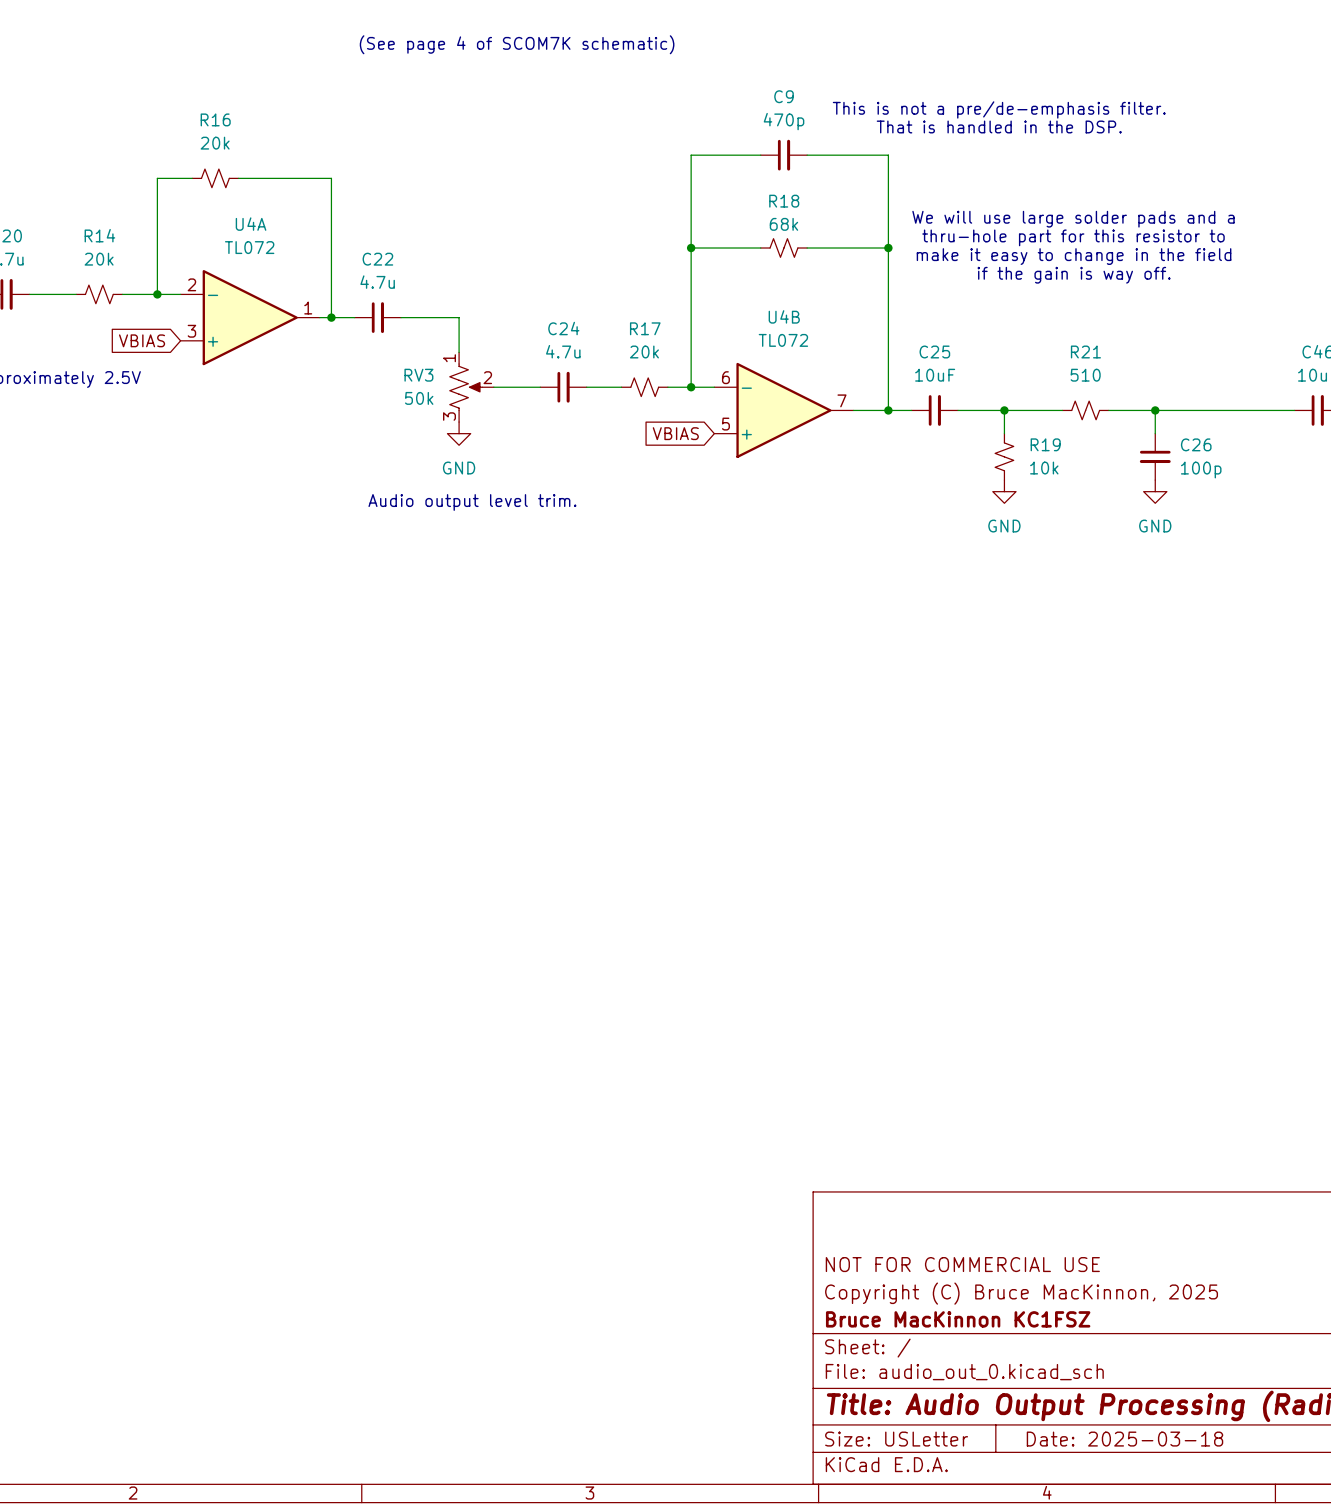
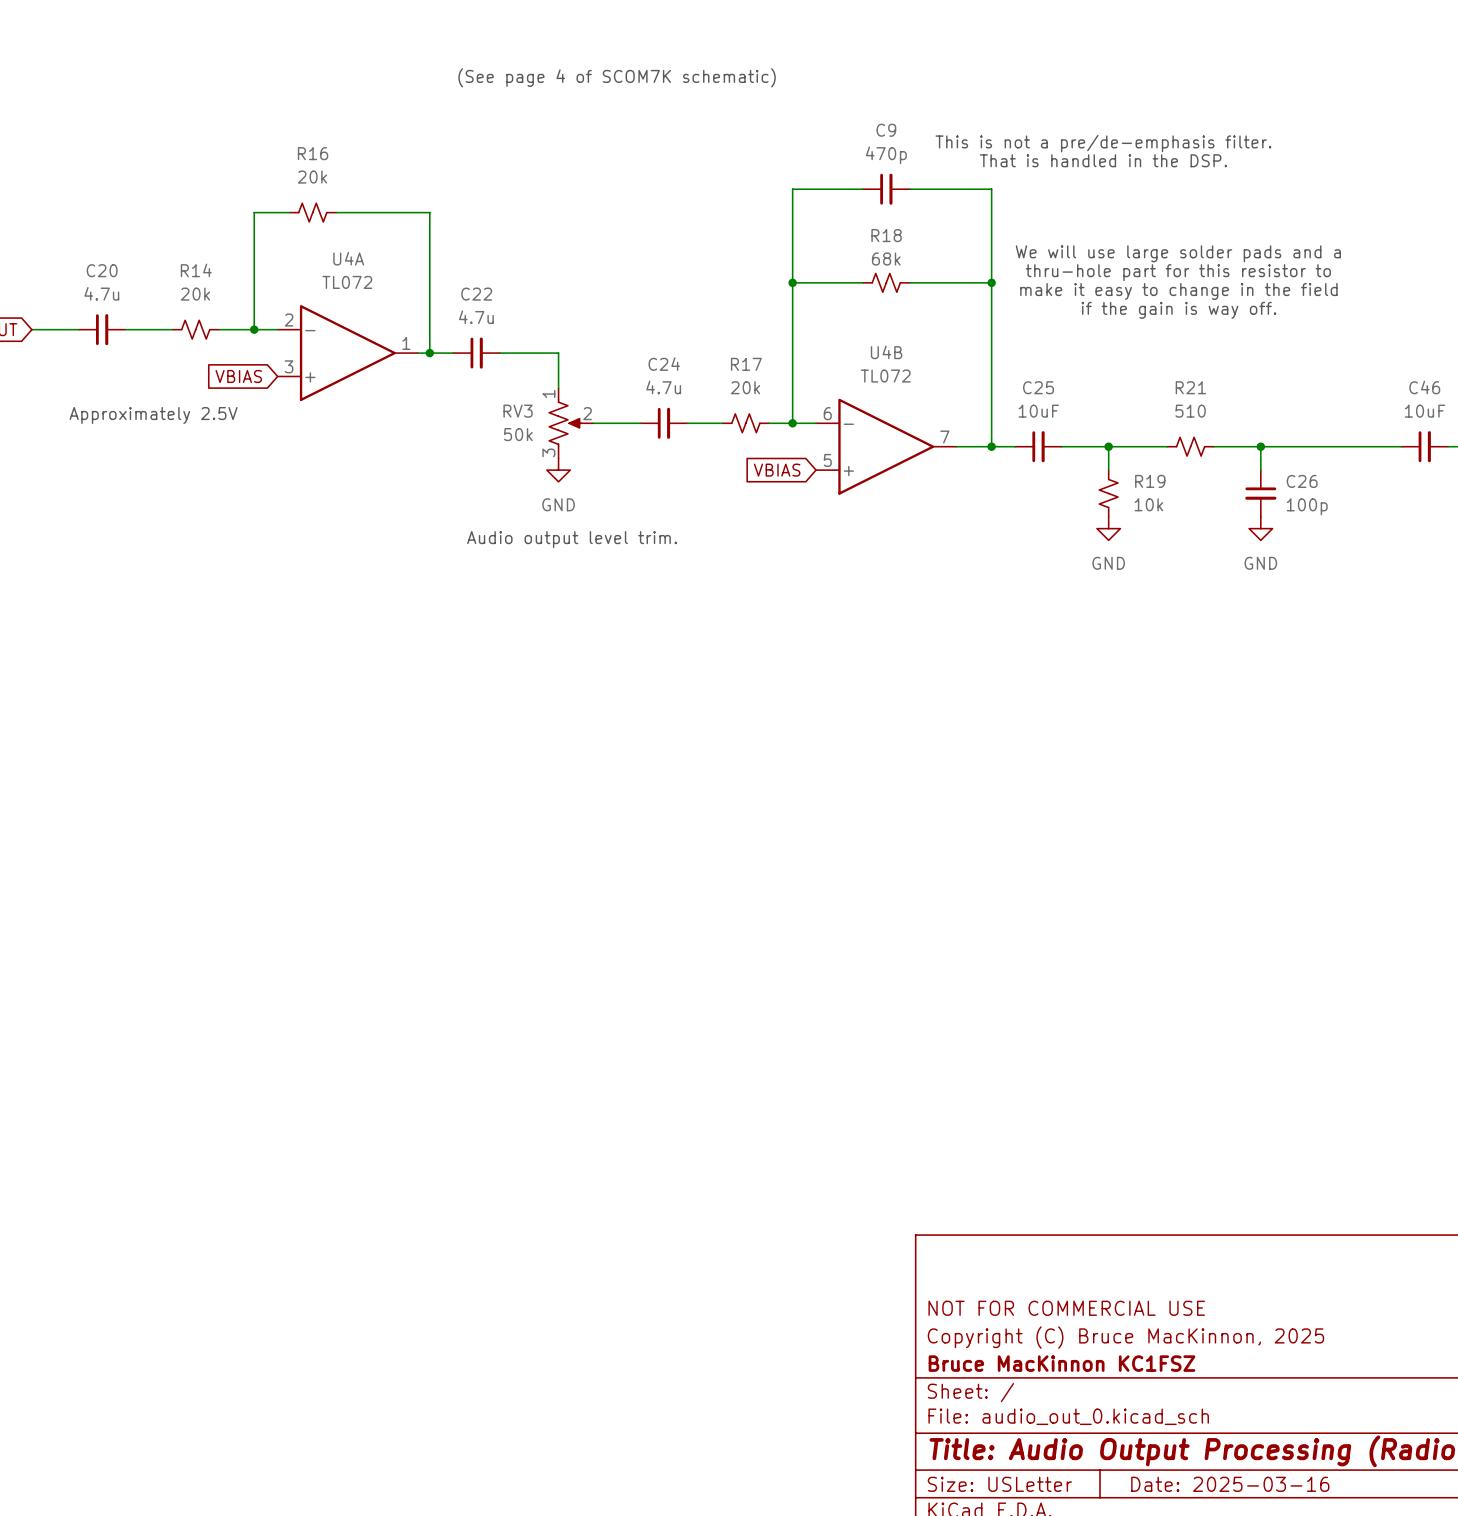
title block: Date: 2025-03-18 (1124, 1439) -> Date: 2025-03-16 (1230, 1484)

